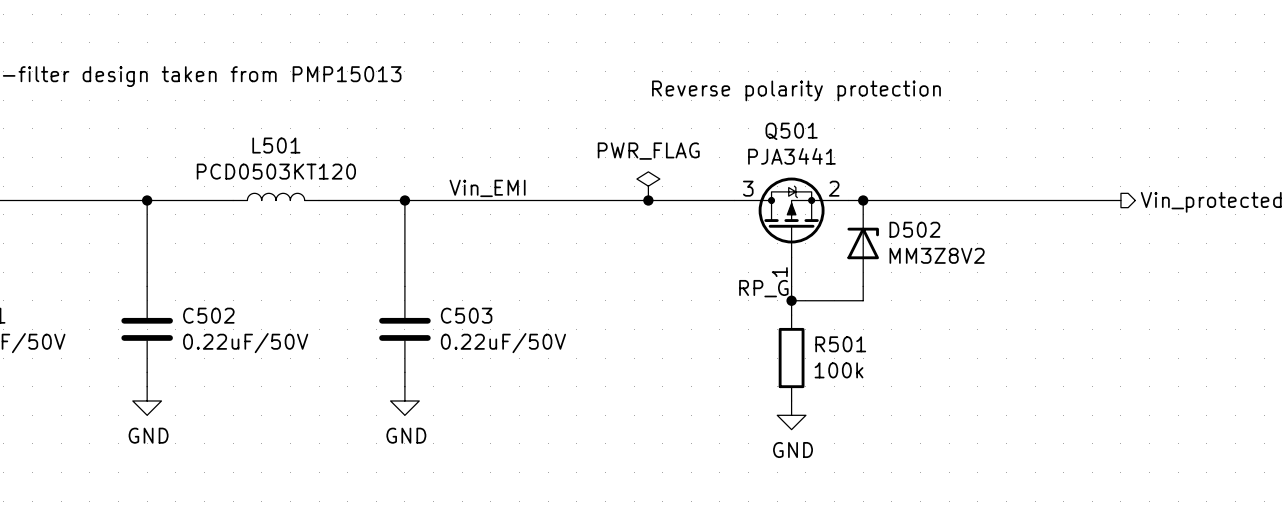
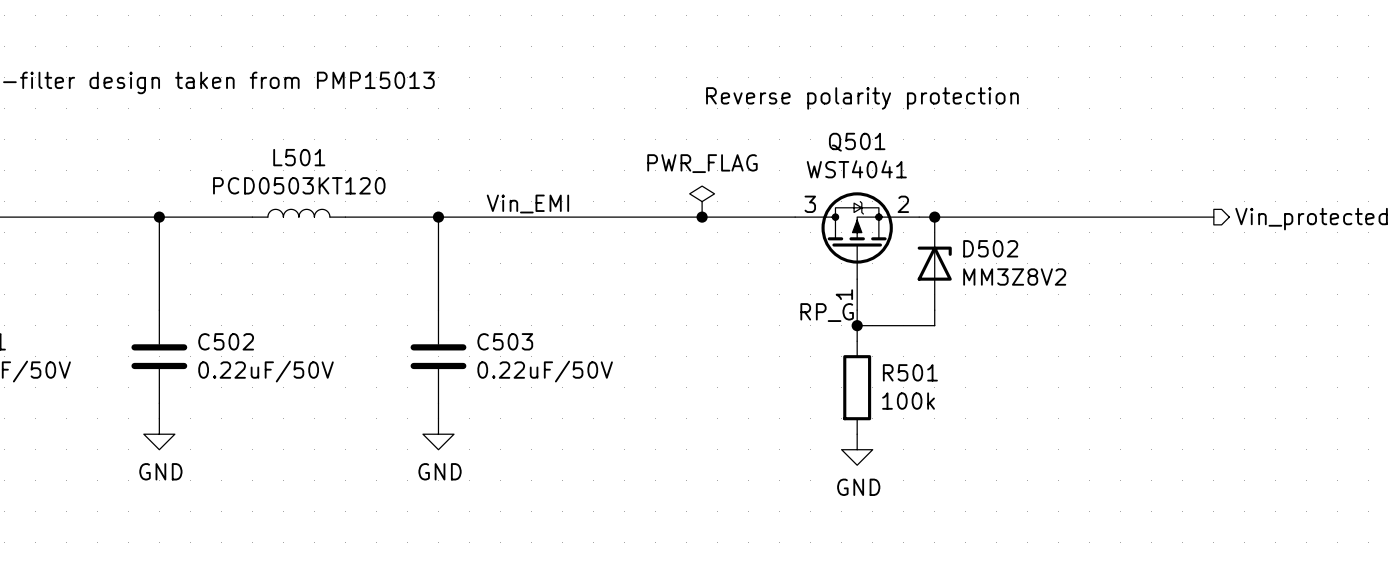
Q501 value: PJA3441 (791, 156) -> WST4041 (856, 169)

